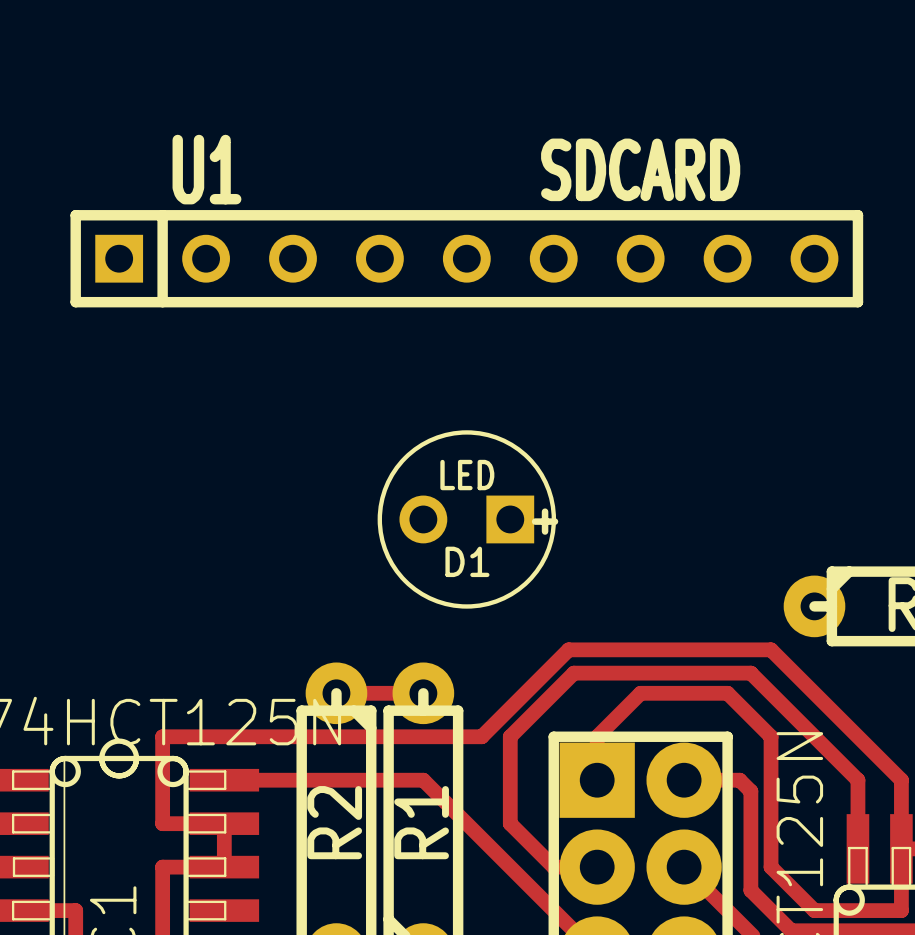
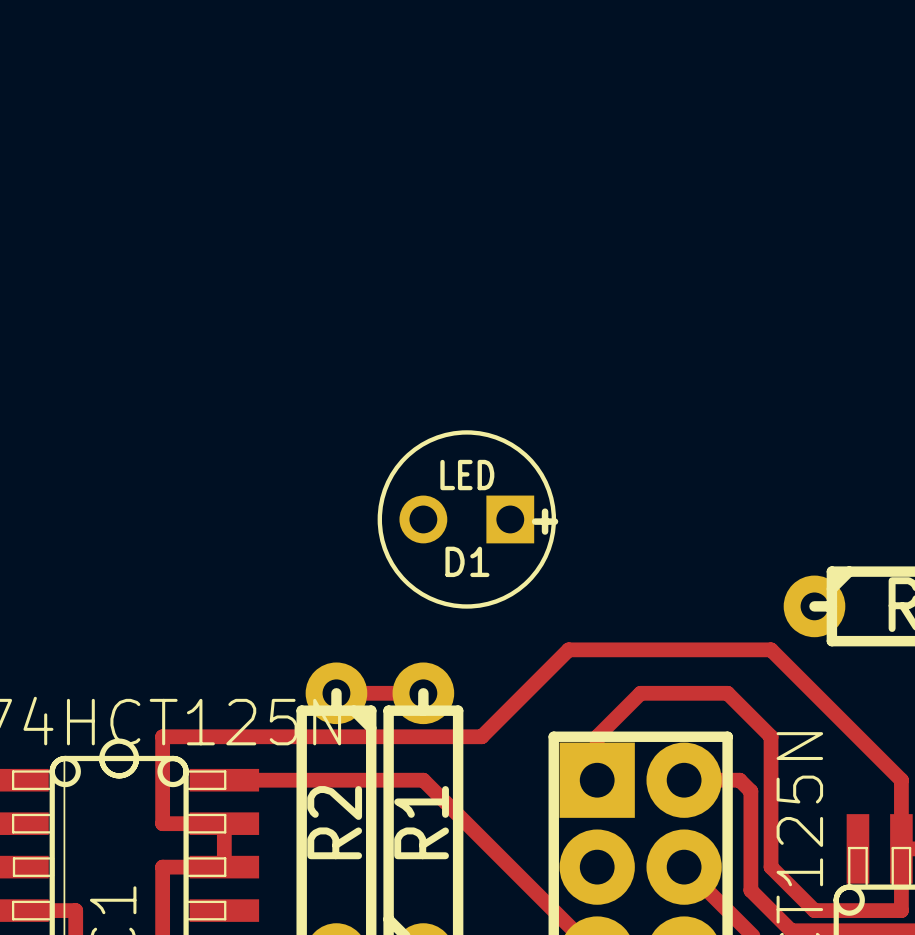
U1: SDCARD (466, 258) -> none
top track: (857, 848) (857, 780) (750, 673) (573, 673) (510, 736) (510, 823) (553, 867) (597, 867) -> none

